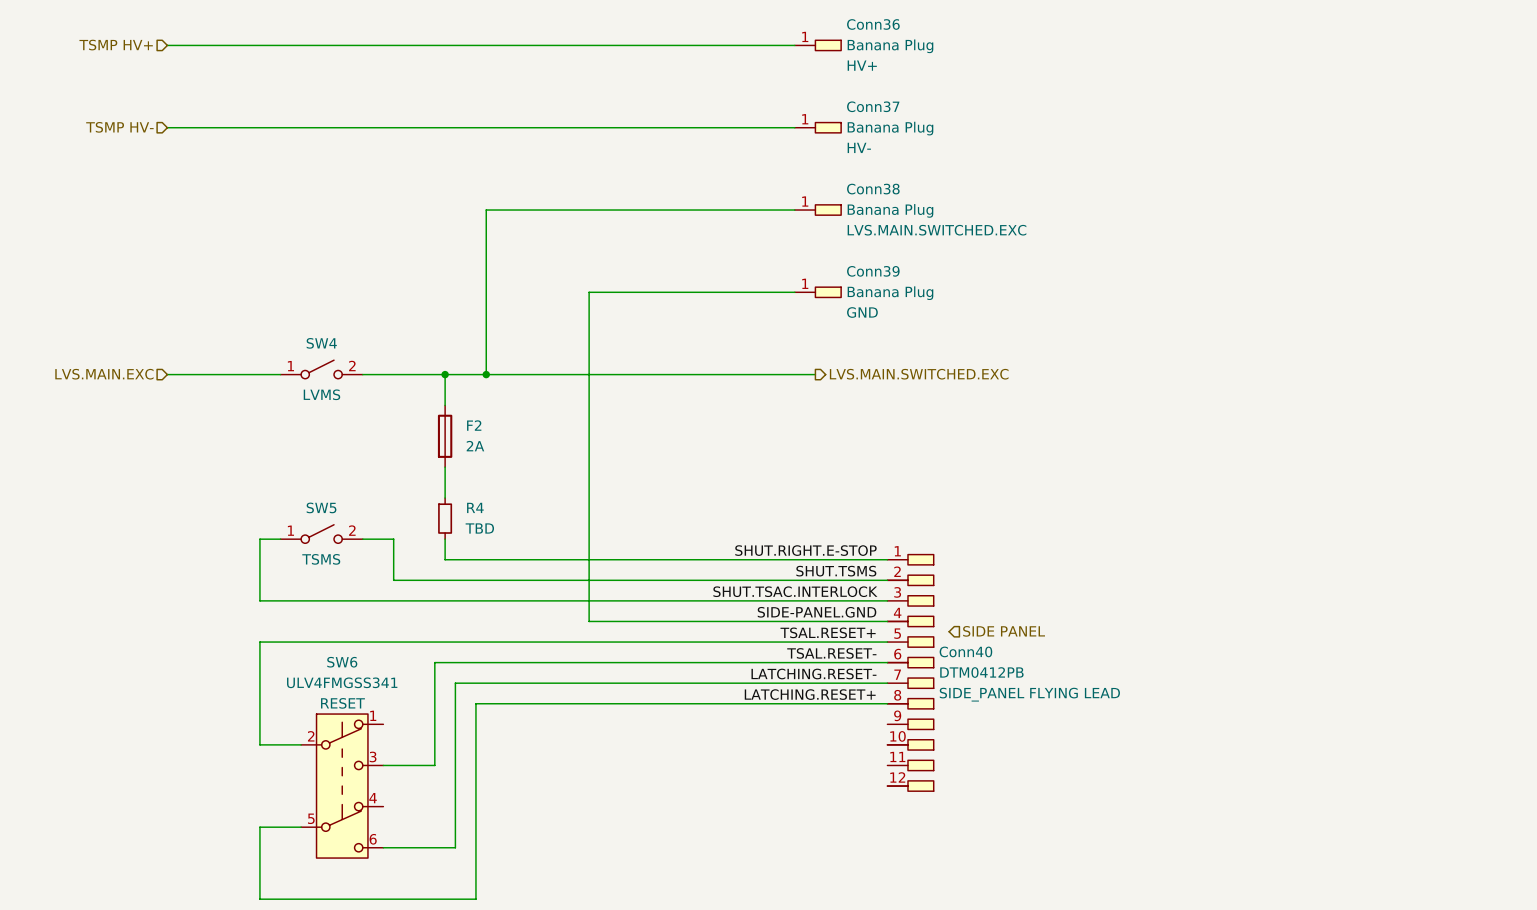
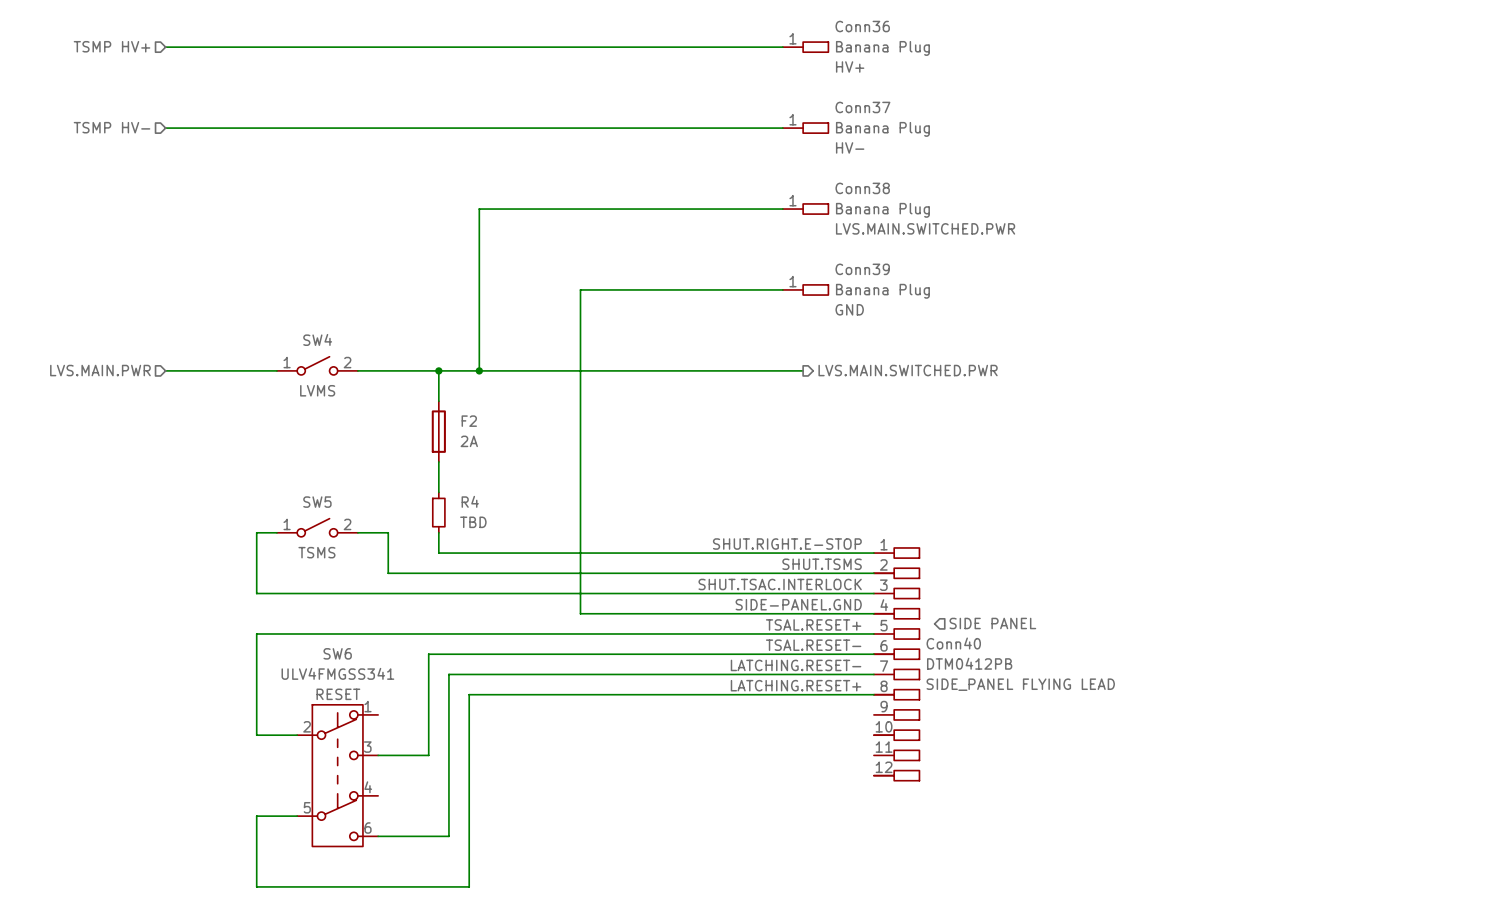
Conn38 text: LVS.MAIN.SWITCHED.EXC (936, 230) -> LVS.MAIN.SWITCHED.PWR (925, 228)
hierarchical label: LVS.MAIN.EXC (104, 374) -> LVS.MAIN.PWR (100, 370)
hierarchical label: LVS.MAIN.SWITCHED.EXC (919, 374) -> LVS.MAIN.SWITCHED.PWR (908, 370)

